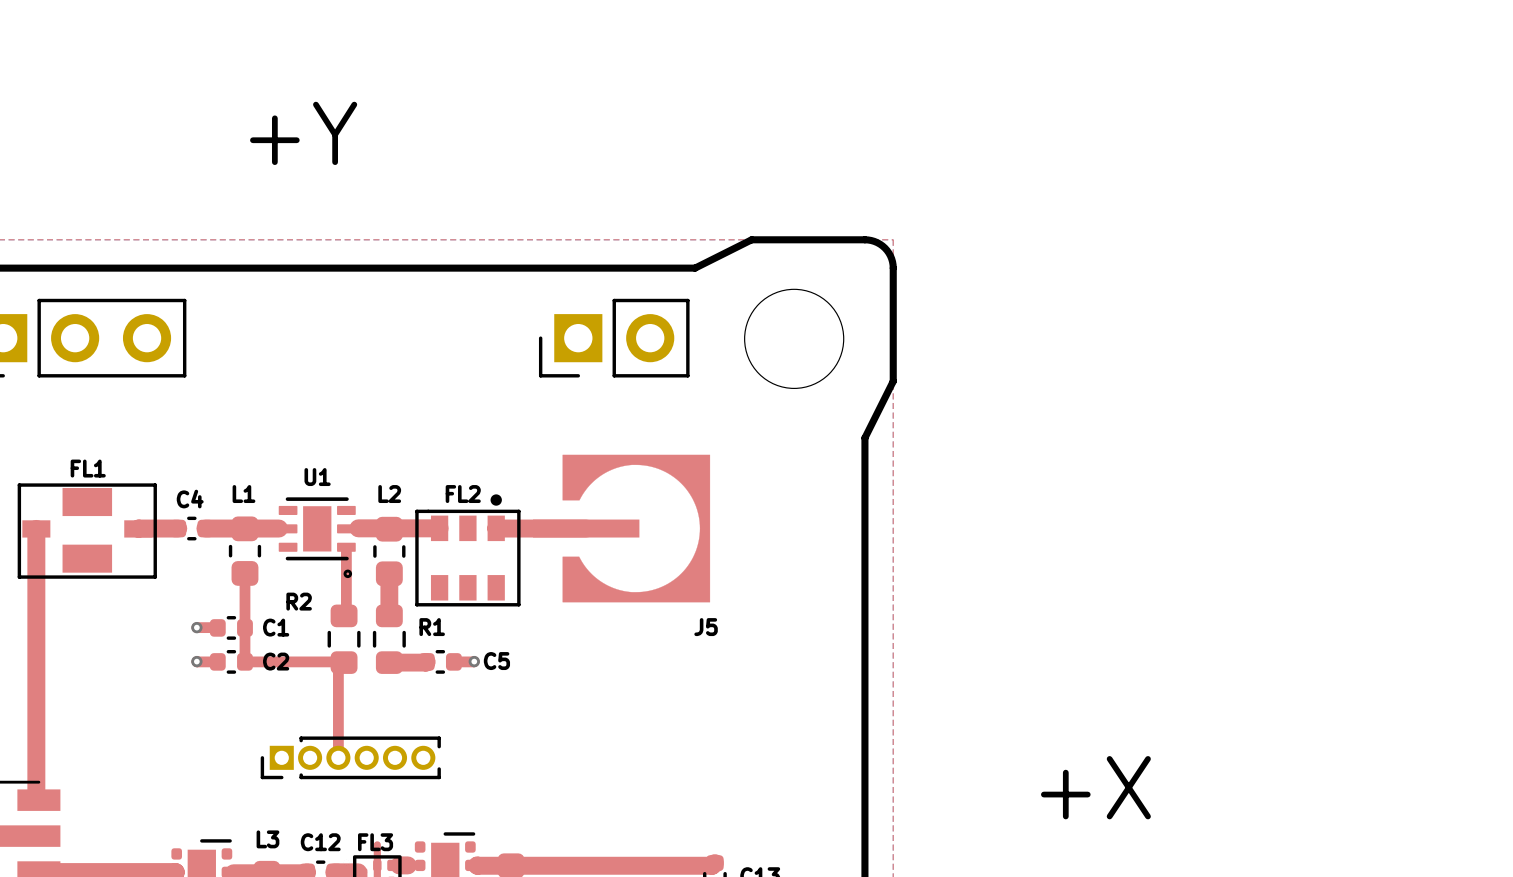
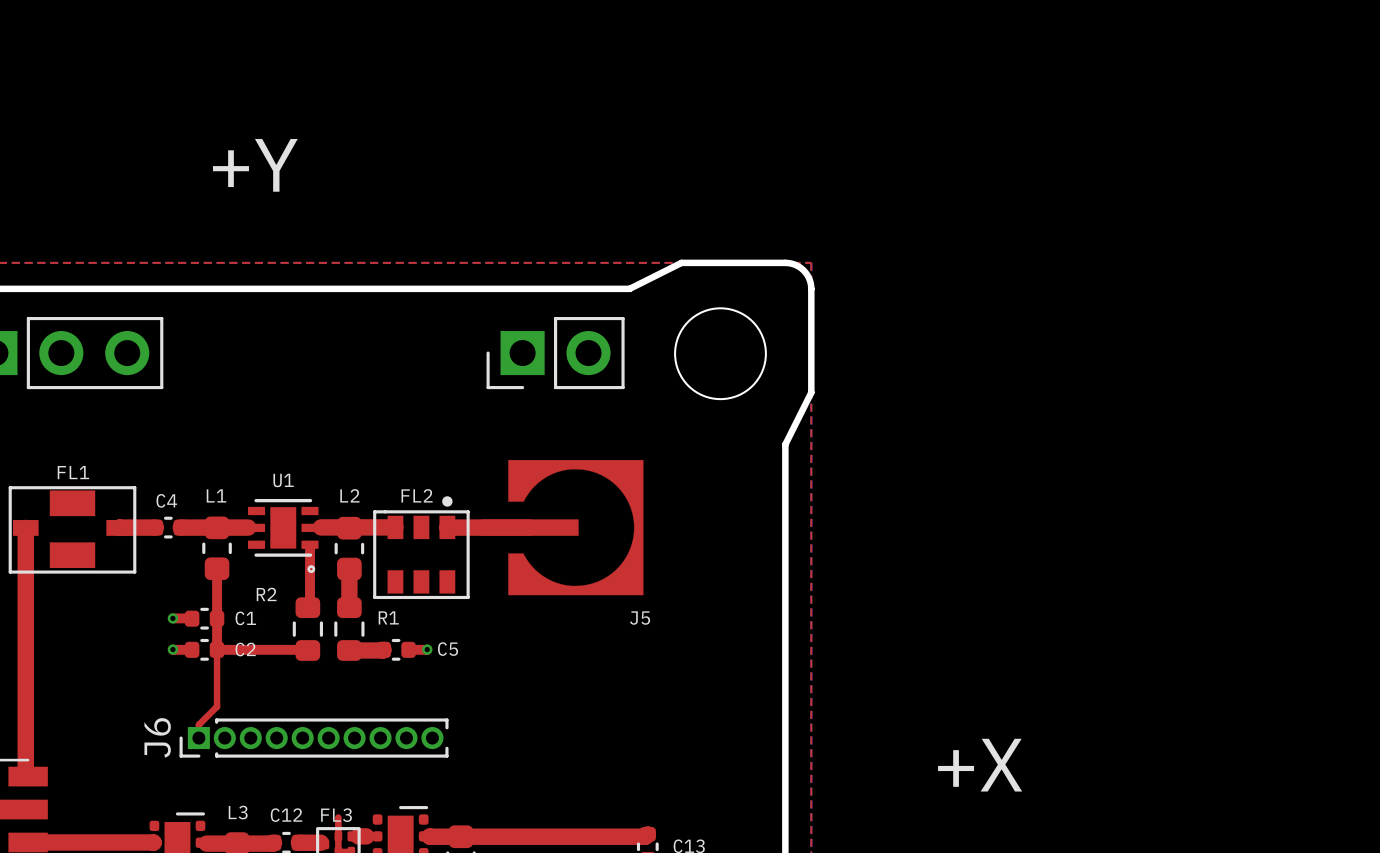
top track: none -> (217, 649) (217, 706) (198, 724) (198, 738)
top track: (338, 668) (338, 757) -> none
part: (350, 757) -> none
J6: none -> (314, 738)

